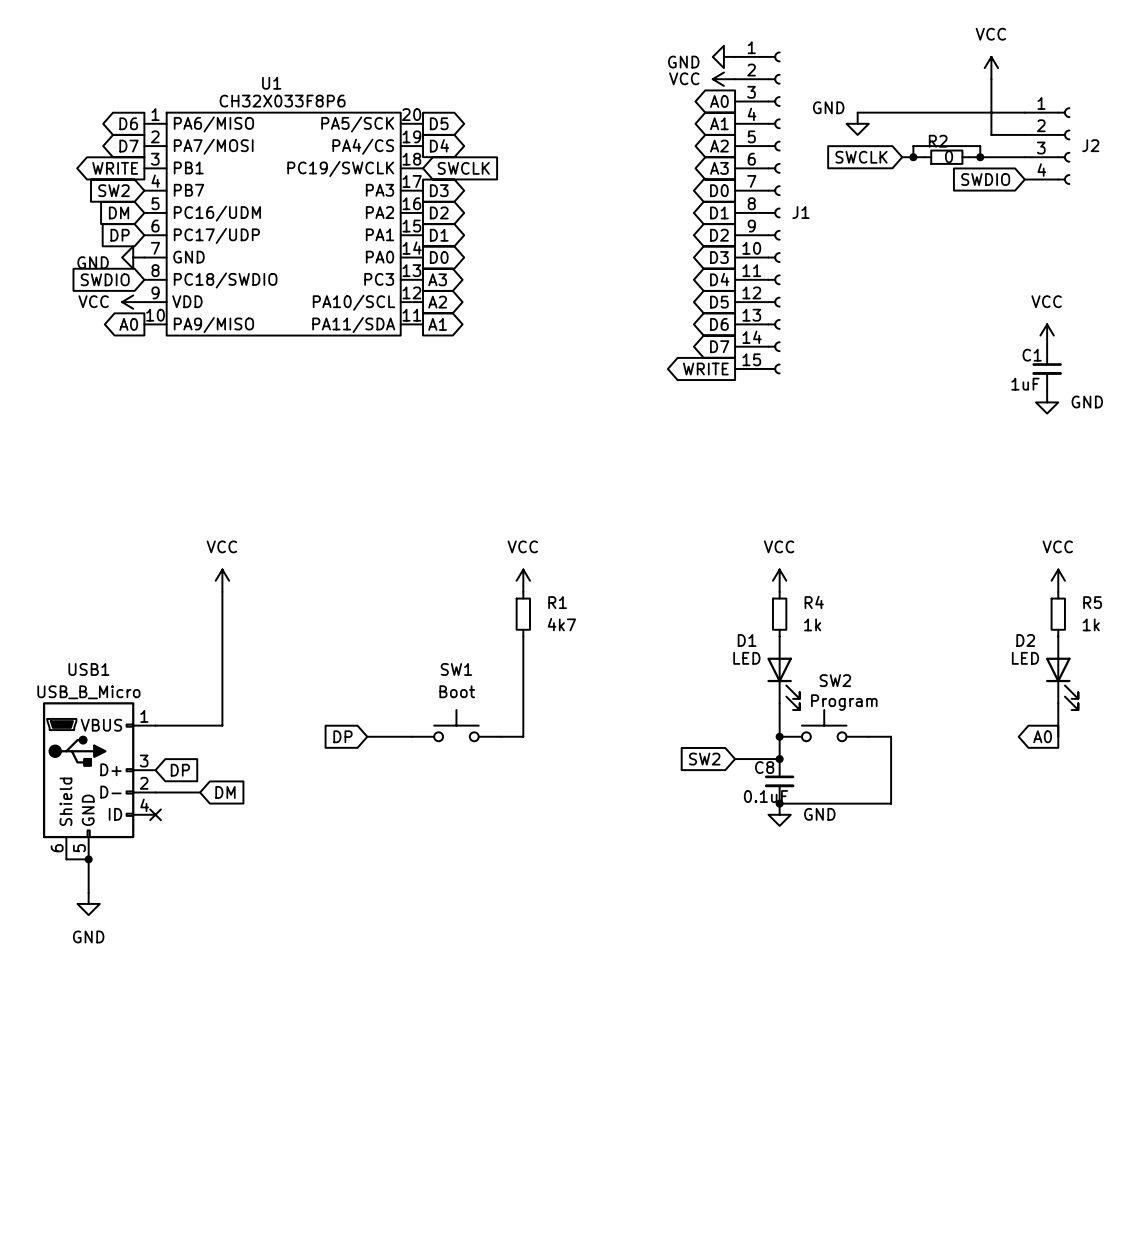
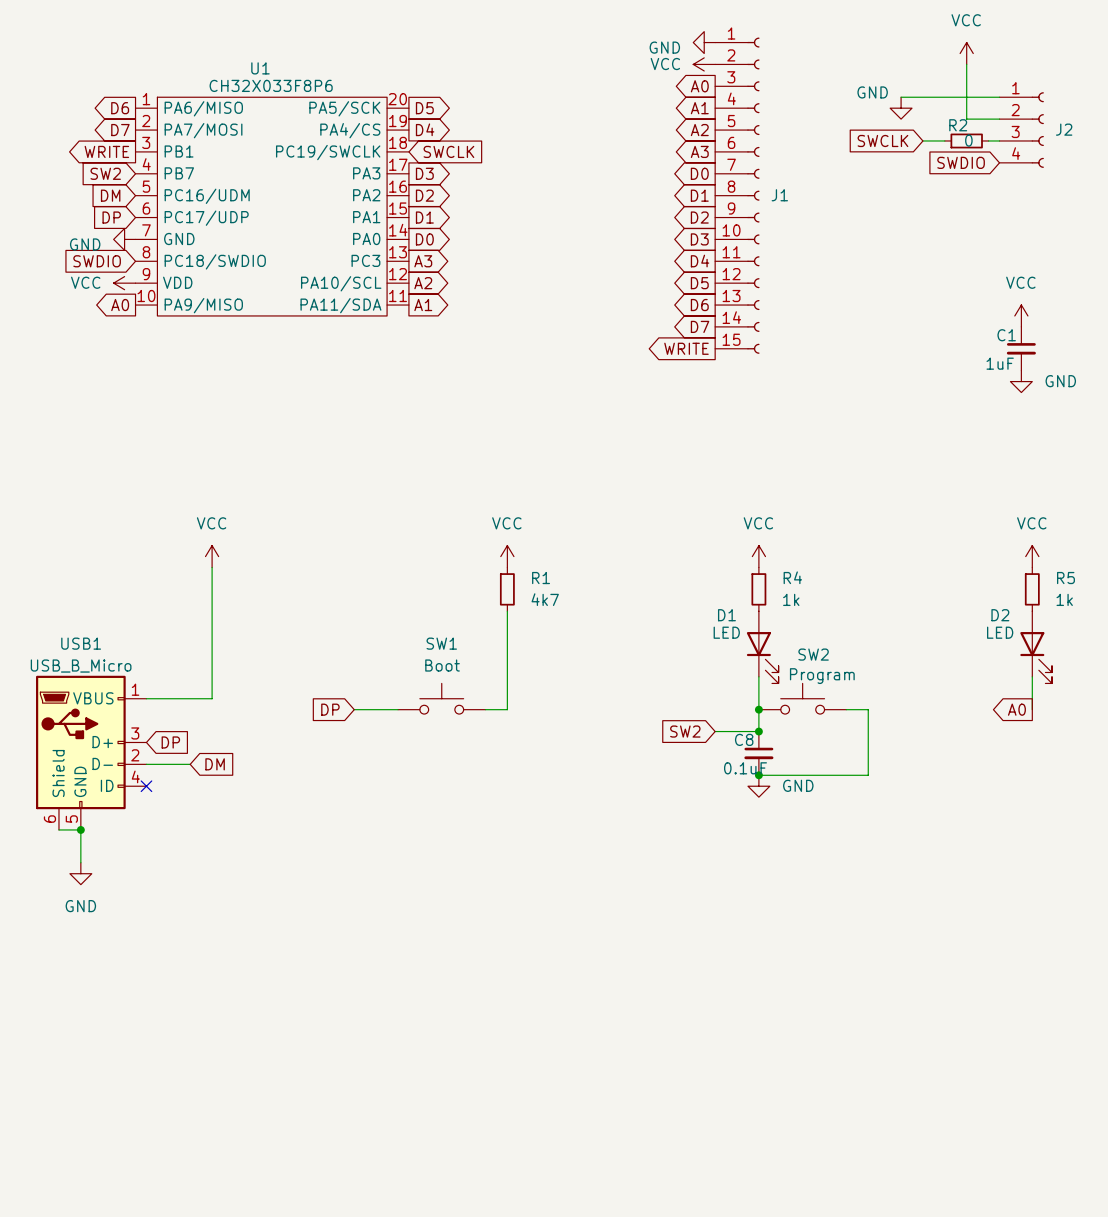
wire: (857, 112) (924, 112) -> none
power symbol position: GND (857, 123) -> GND (901, 108)
global label position: SWCLK (861, 157) -> SWCLK (882, 140)
wire: (902, 157) (924, 157) -> none
wire: (913, 157) (913, 146) (980, 146) (980, 157) -> none
junction: (913, 157) -> none
R2 position: (946, 157) -> (966, 140)
wire: (969, 157) (1013, 157) -> (944, 140) (922, 140)
junction: (980, 157) -> none

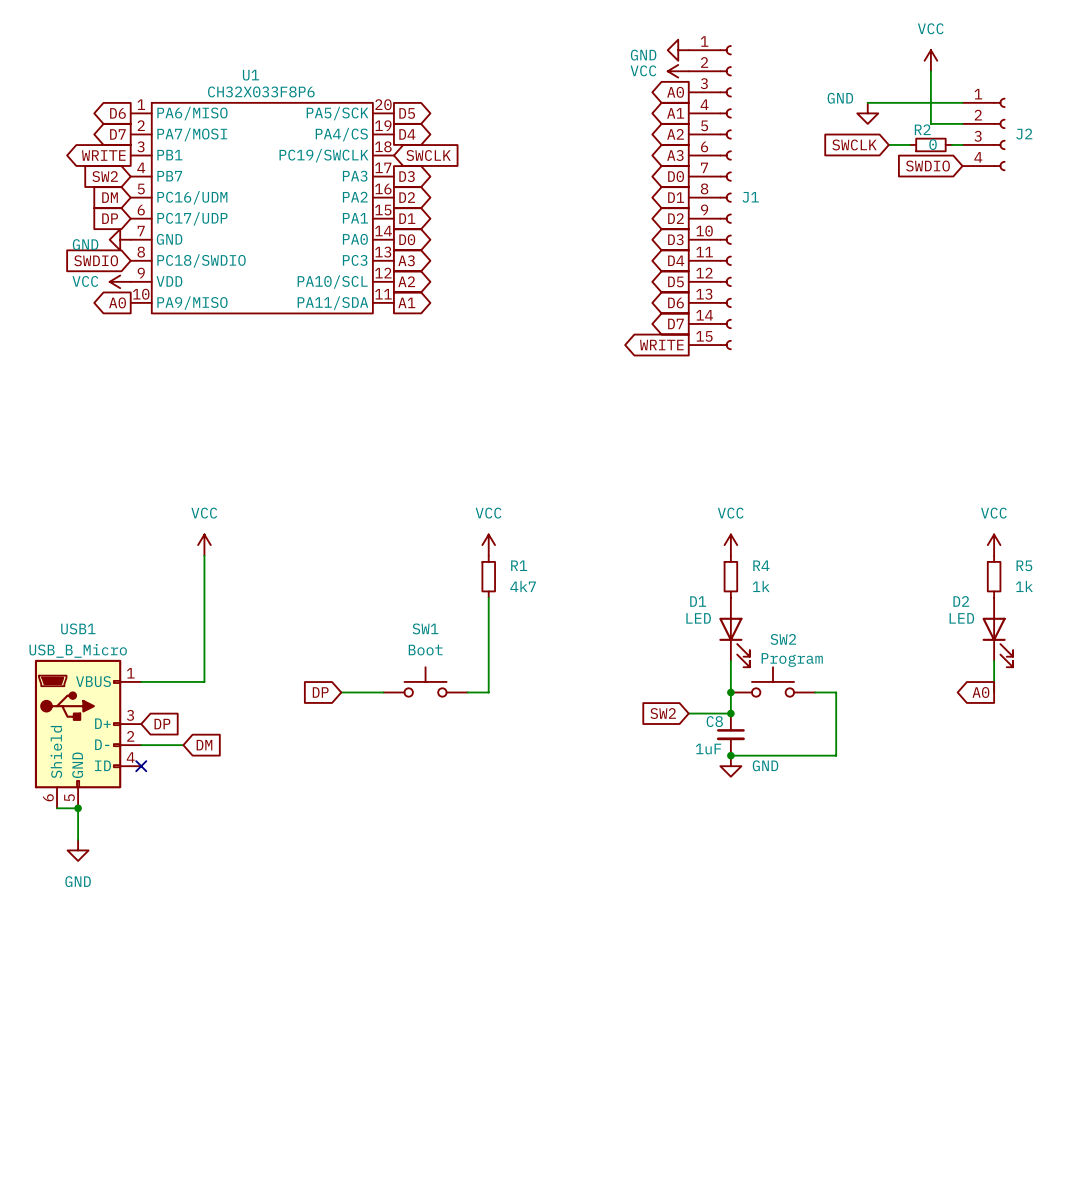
power symbol: VCC (1021, 315) -> none
C1: 1uF (1021, 348) -> none
power symbol: GND (1021, 381) -> none
C8 value: 0.1uF (745, 768) -> 1uF (708, 749)

